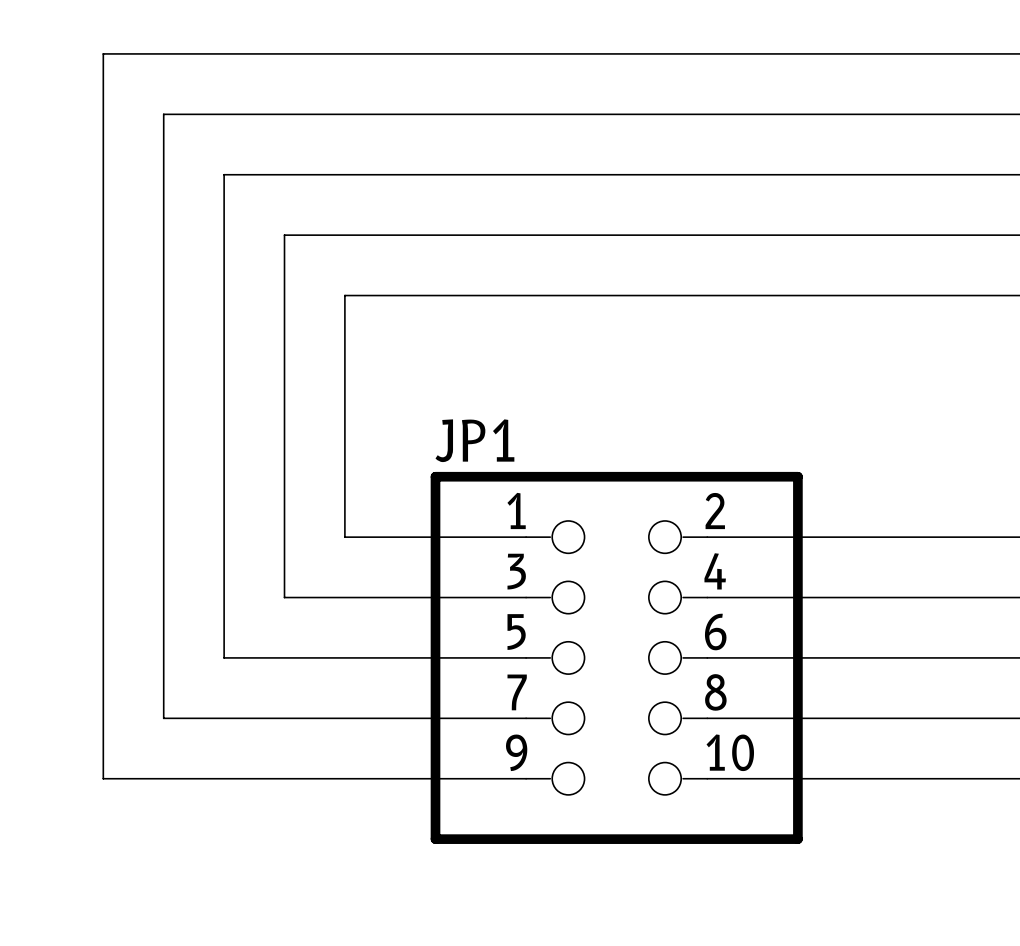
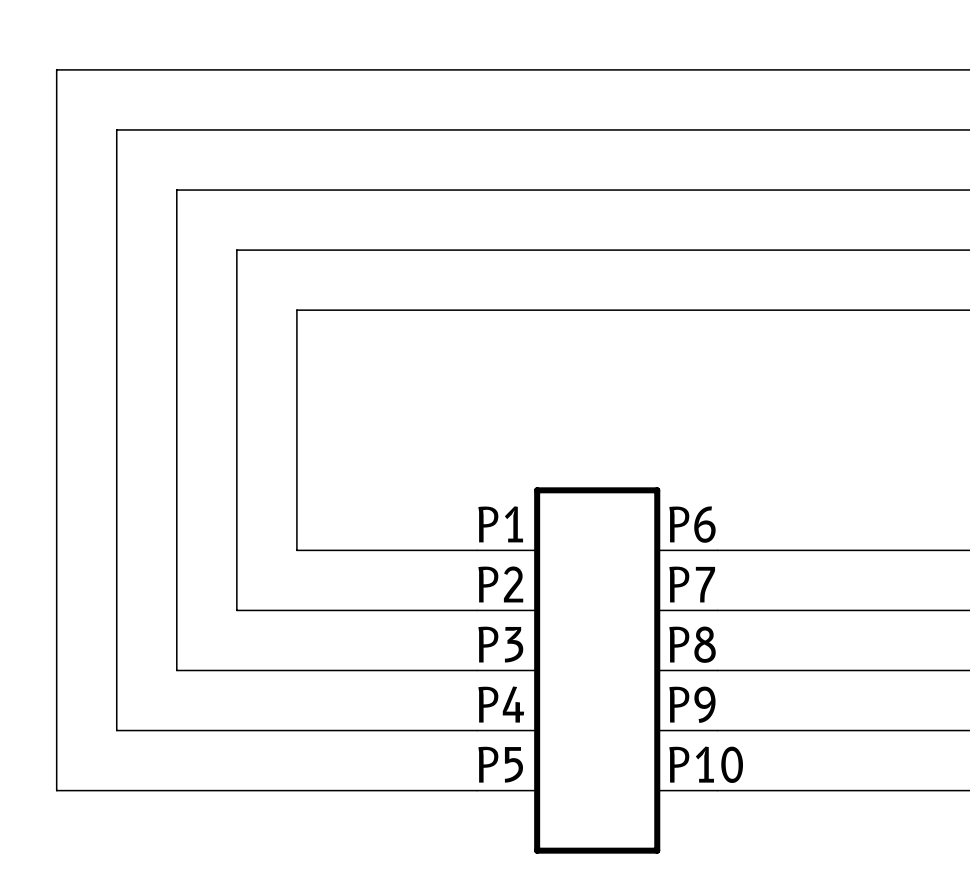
JP1: (616, 657) -> none
part: none -> (597, 670)

